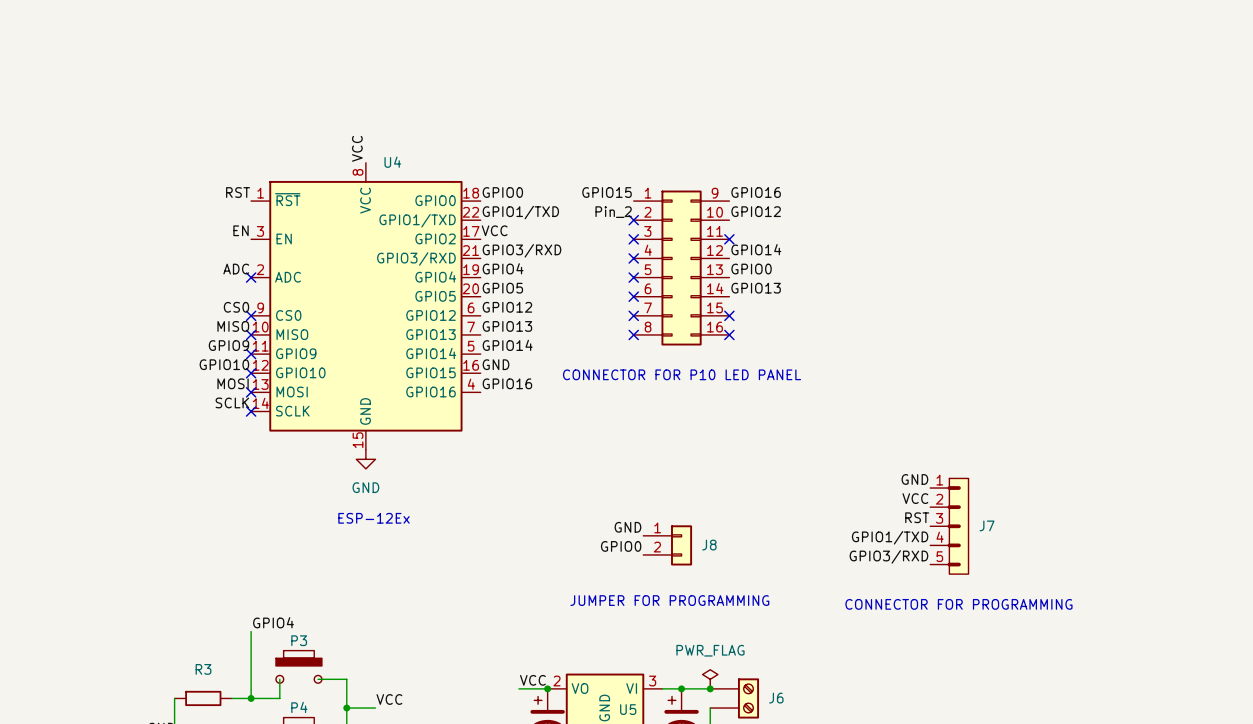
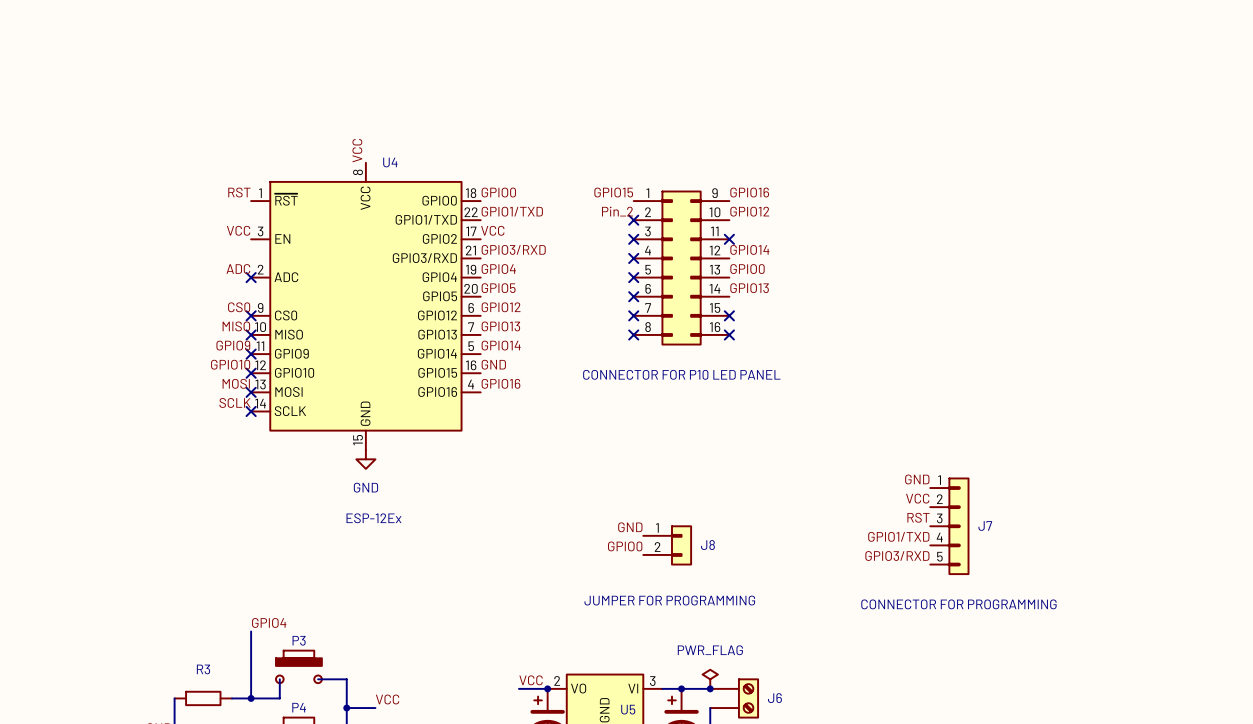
label: EN (241, 230) -> VCC (238, 230)

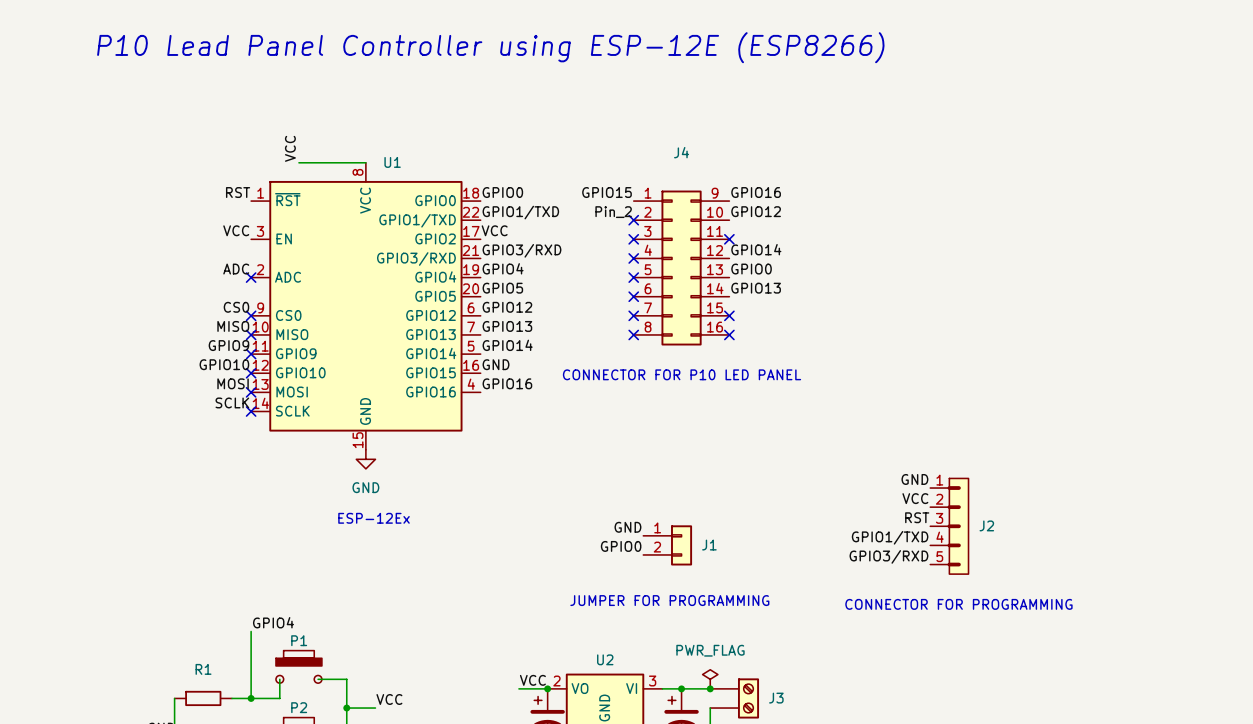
text: none -> P10 Lead Panel Controller using ESP-12E (ESP8266) (490, 47)
label position: VCC (357, 150) -> VCC (290, 148)
J4 name: none -> J4 (681, 152)
wire: none -> (298, 162) (365, 162)
U4 name: U4 (390, 162) -> U1 (392, 162)
J7 name: J7 (985, 525) -> J2 (986, 525)
J8 name: J8 (707, 545) -> J1 (709, 545)
P3 name: P3 (299, 640) -> P1 (299, 640)
R3 name: R3 (203, 669) -> R1 (203, 669)
J6 name: J6 (774, 698) -> J3 (776, 698)
P4 name: P4 (299, 707) -> P2 (299, 707)
U5 name: U5 (628, 709) -> U2 (605, 659)

